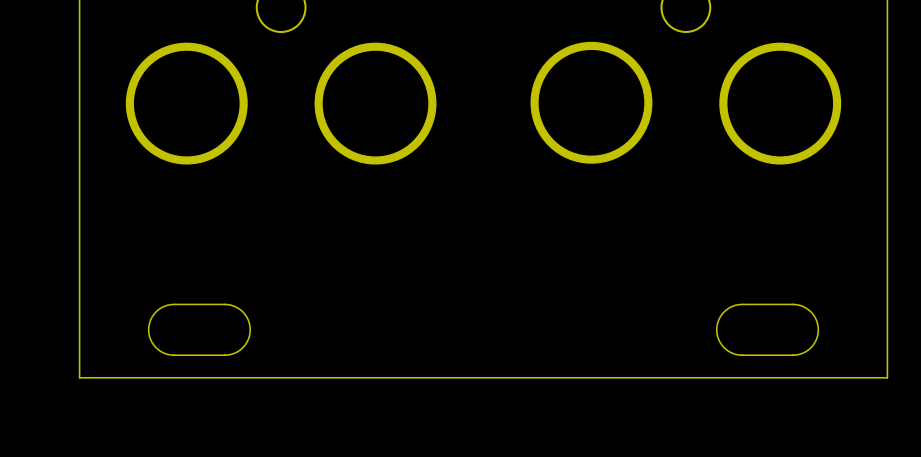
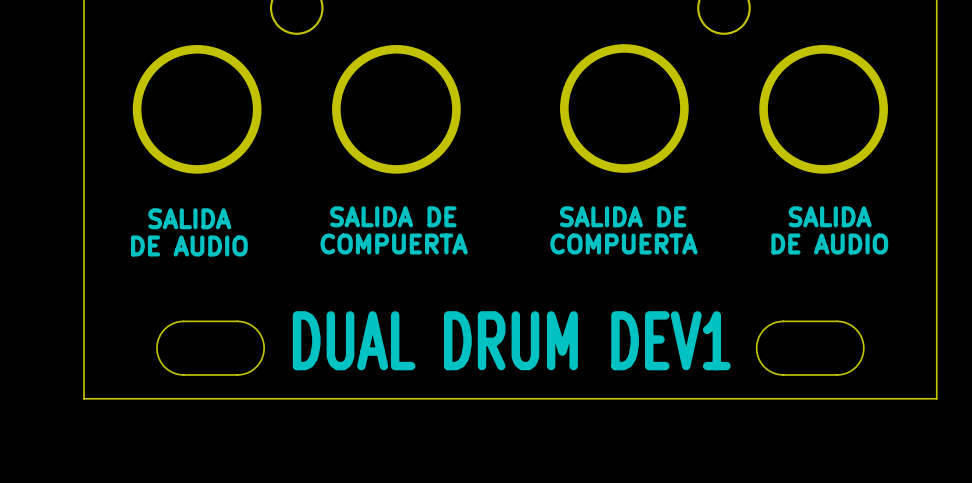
text: none -> SALIDA DE (393, 216)
text: none -> SALIDA DE (623, 216)
text: none -> SALIDA (830, 216)
text: none -> SALIDA (189, 218)
text: none -> COMPUERTA (394, 243)
text: none -> COMPUERTA (623, 243)
text: none -> DE AUDIO (829, 243)
text: none -> DE AUDIO (189, 245)
text: none -> DUAL DRUM DEV1 (511, 340)

